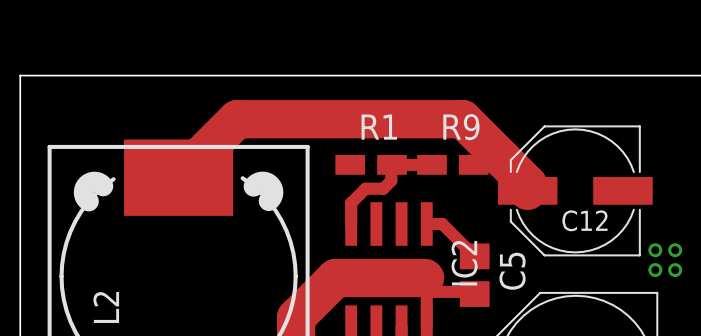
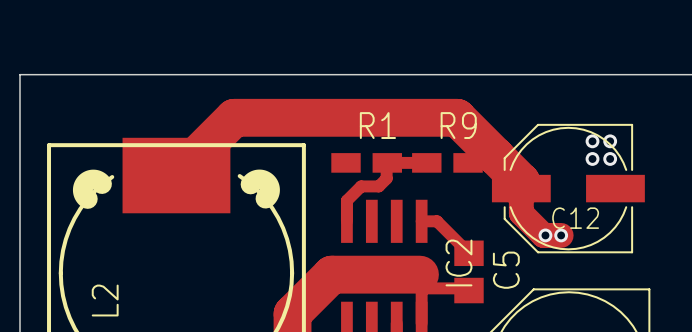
via: none -> (592, 141)
via: none -> (610, 141)
via: none -> (592, 158)
via: none -> (610, 158)
track: none -> (521, 188) (521, 213) (543, 235) (561, 235)
via: none -> (545, 235)
via: none -> (561, 235)
via: (655, 250) -> none
via: (675, 250) -> none
via: (655, 270) -> none
via: (675, 270) -> none

